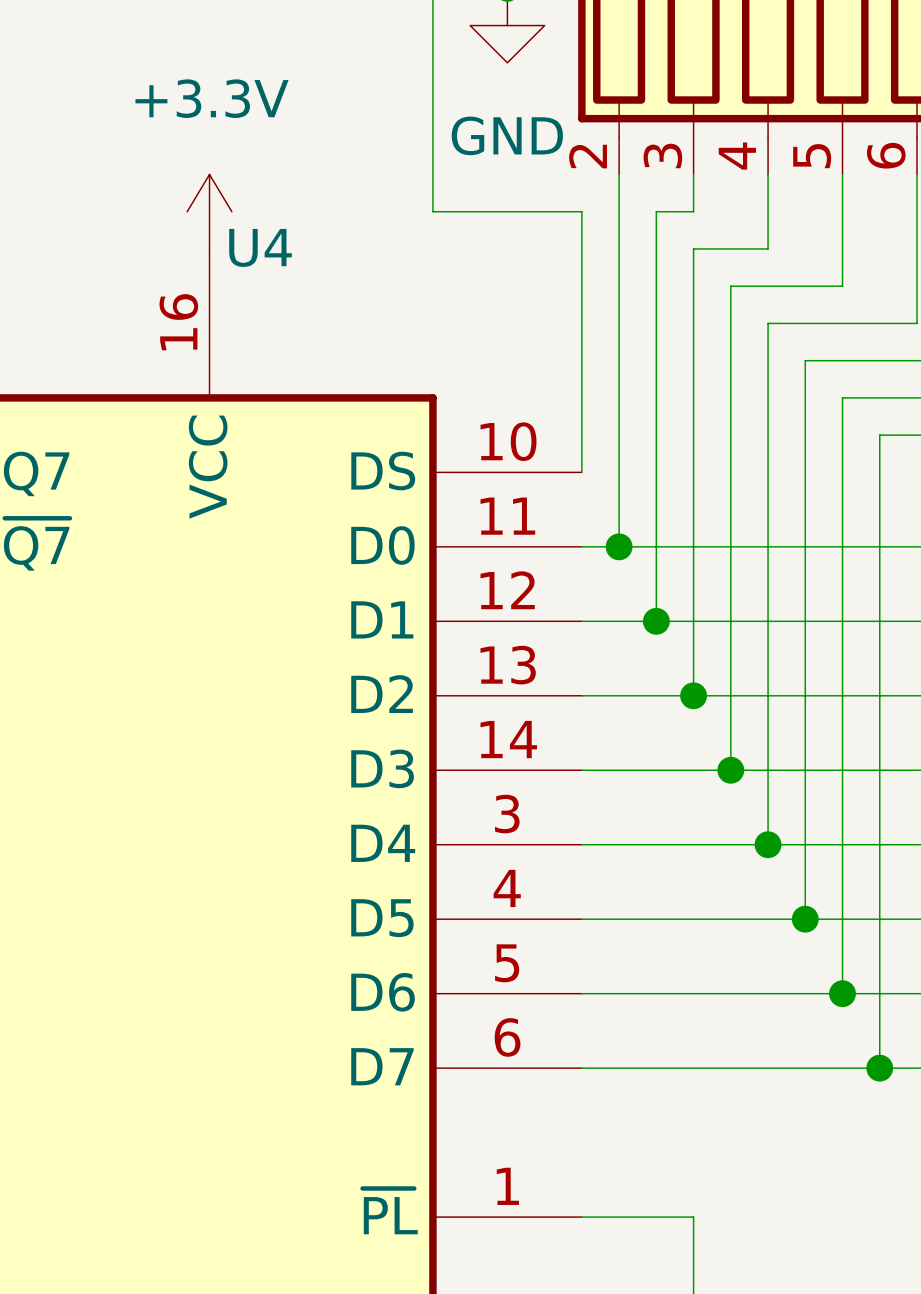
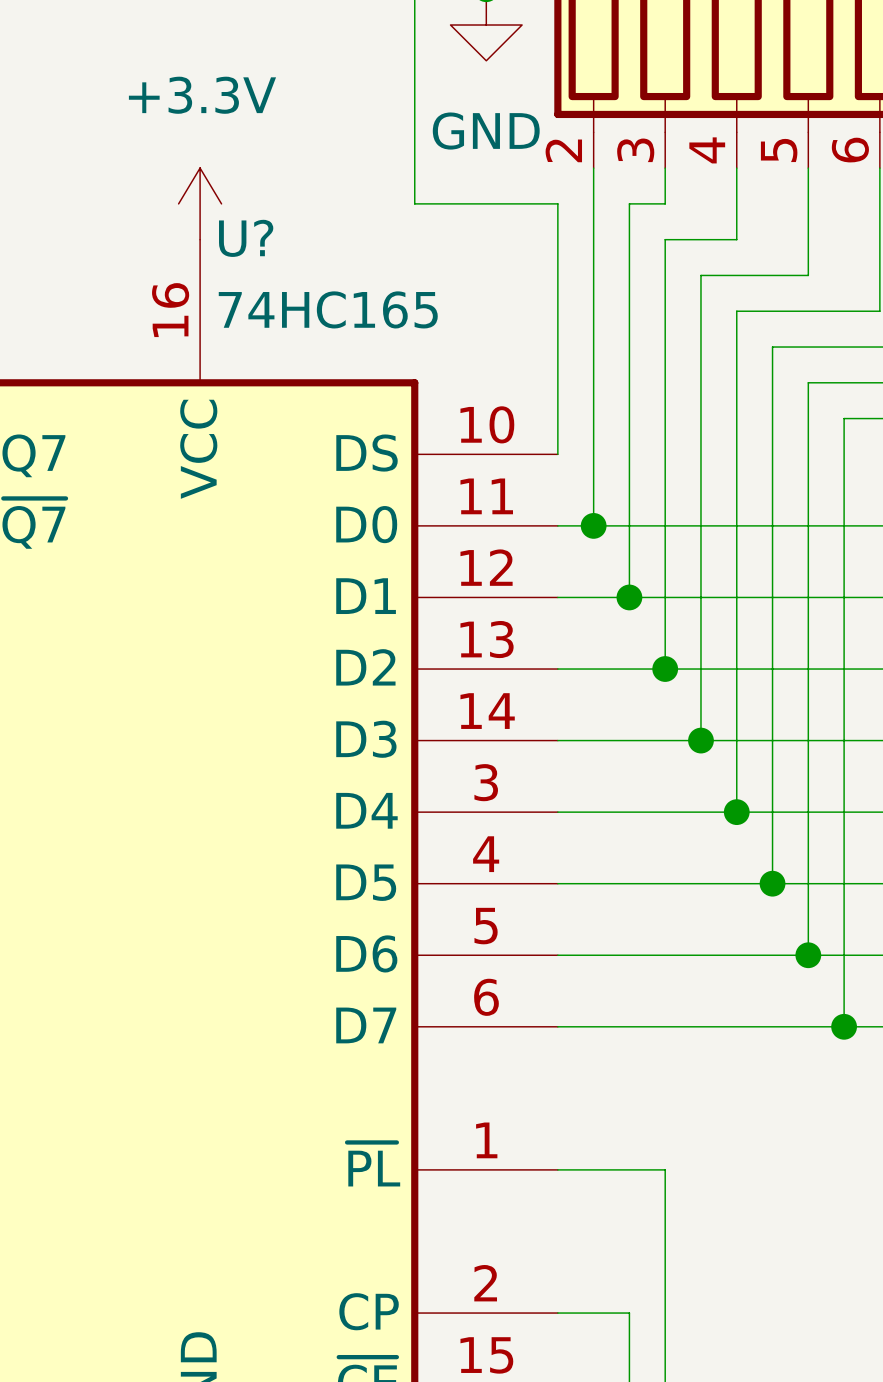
U4 name: U4 (260, 247) -> U? (246, 238)
U4 value: none -> 74HC165 (328, 309)

